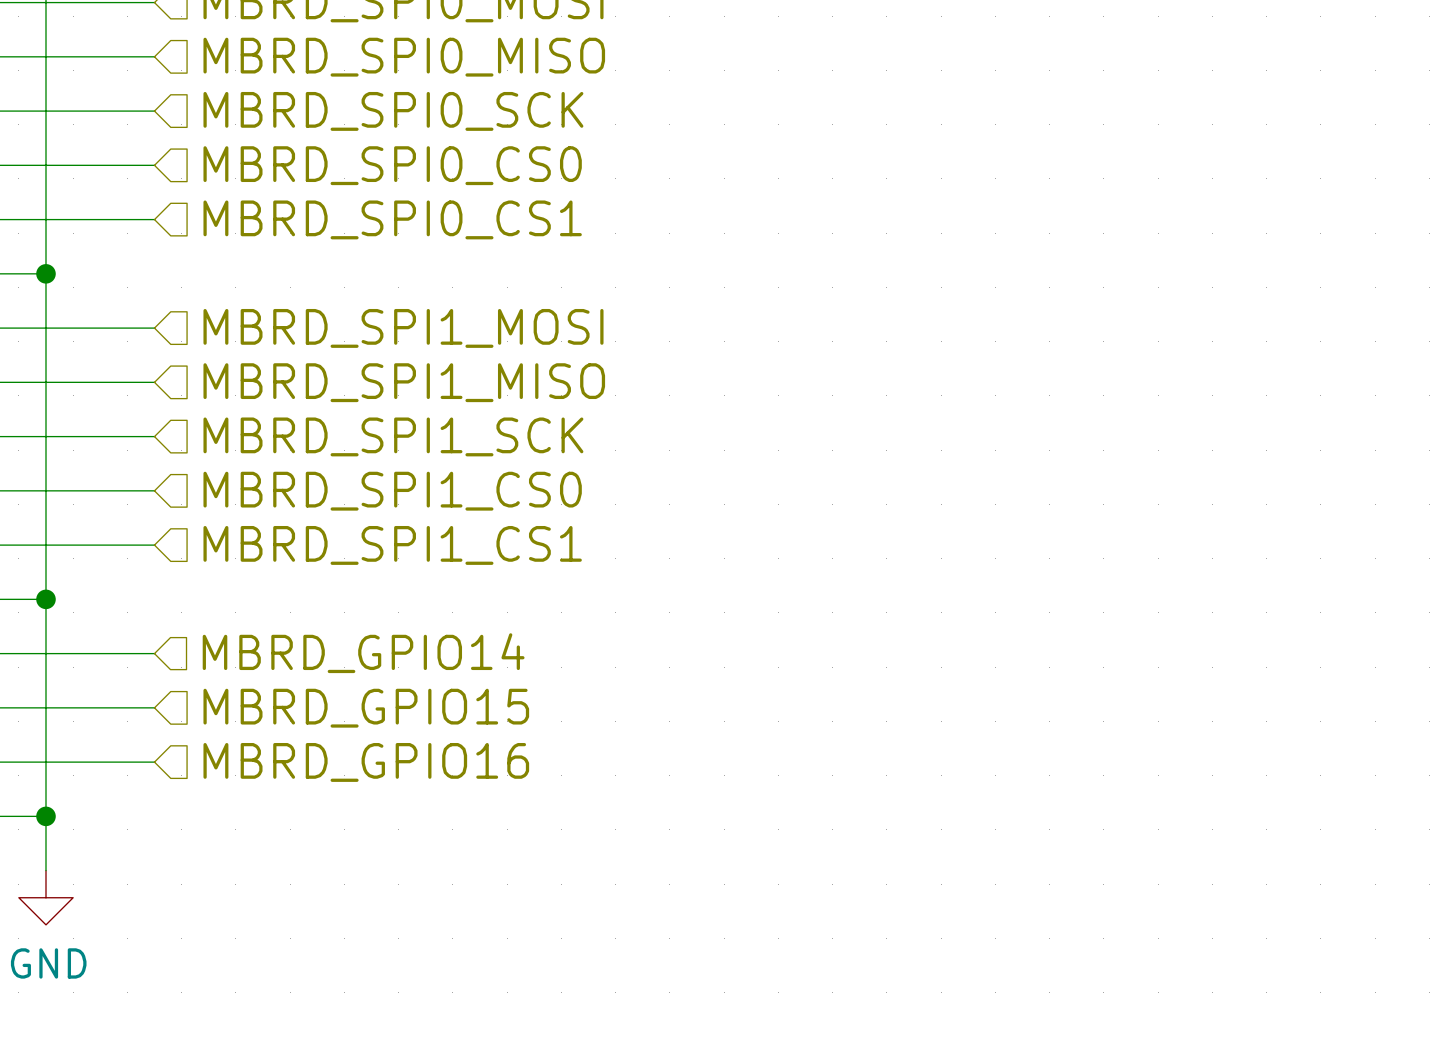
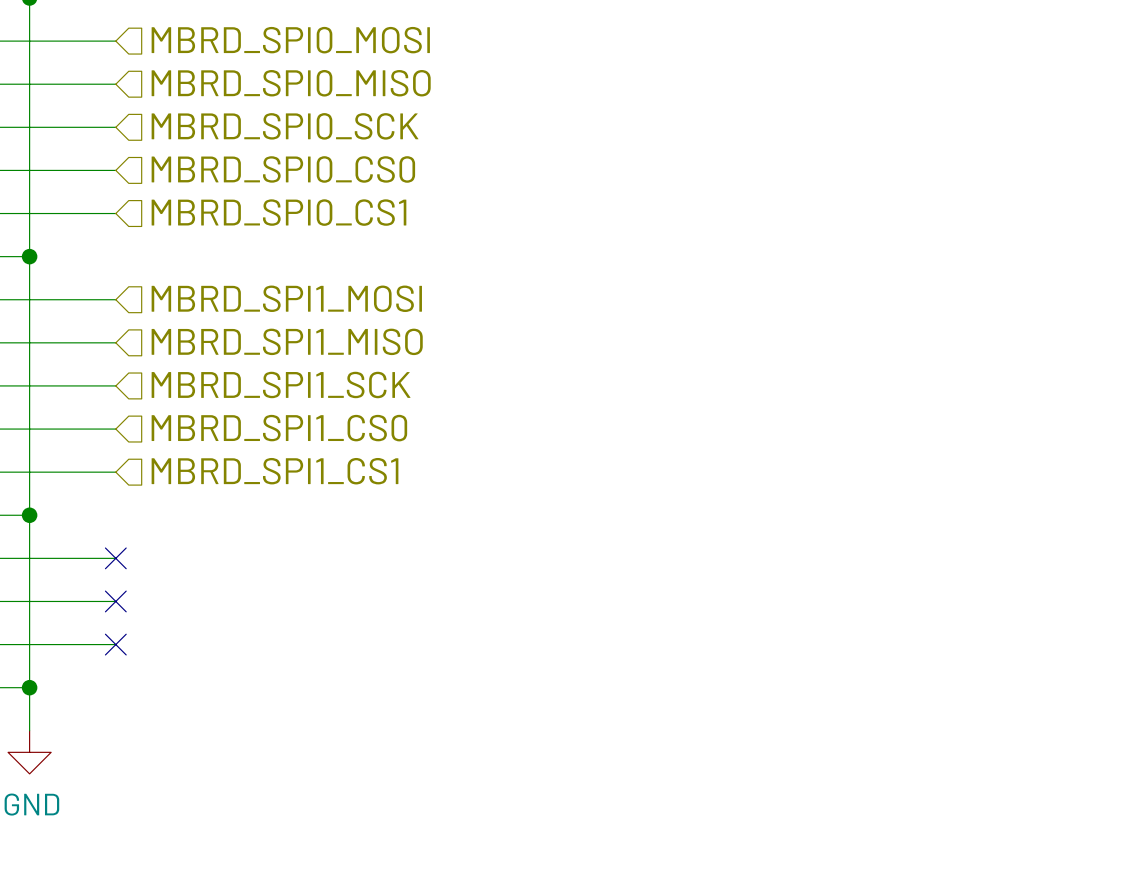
no-connect mark: none -> (115, 558)
hierarchical label: MBRD_GPIO14 (363, 653) -> none
no-connect mark: none -> (115, 601)
hierarchical label: MBRD_GPIO15 (366, 708) -> none
no-connect mark: none -> (115, 644)
hierarchical label: MBRD_GPIO16 (366, 762) -> none

